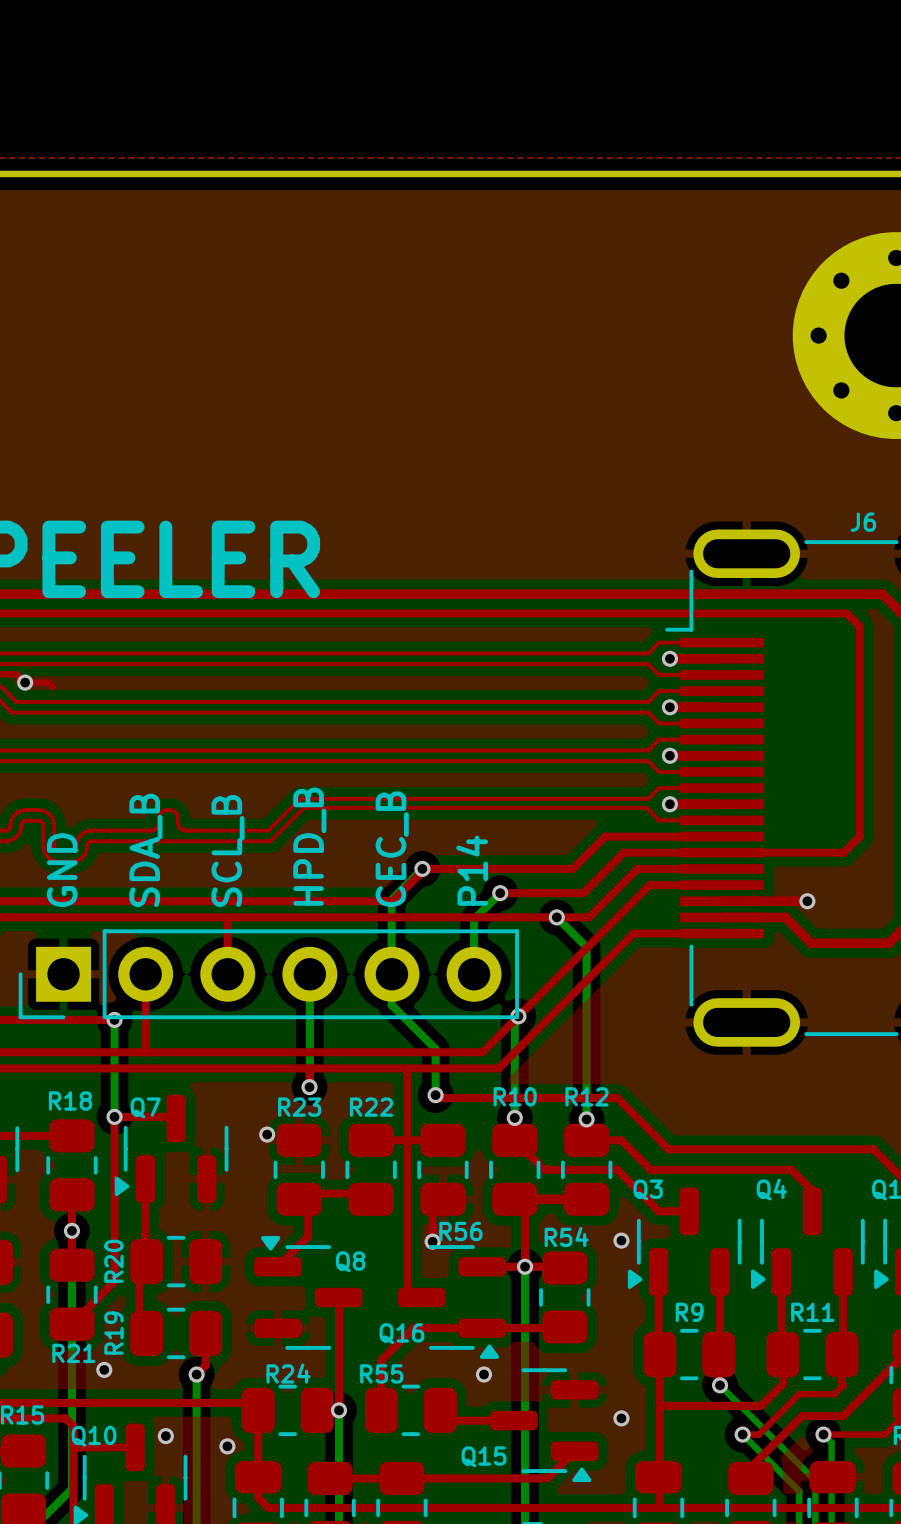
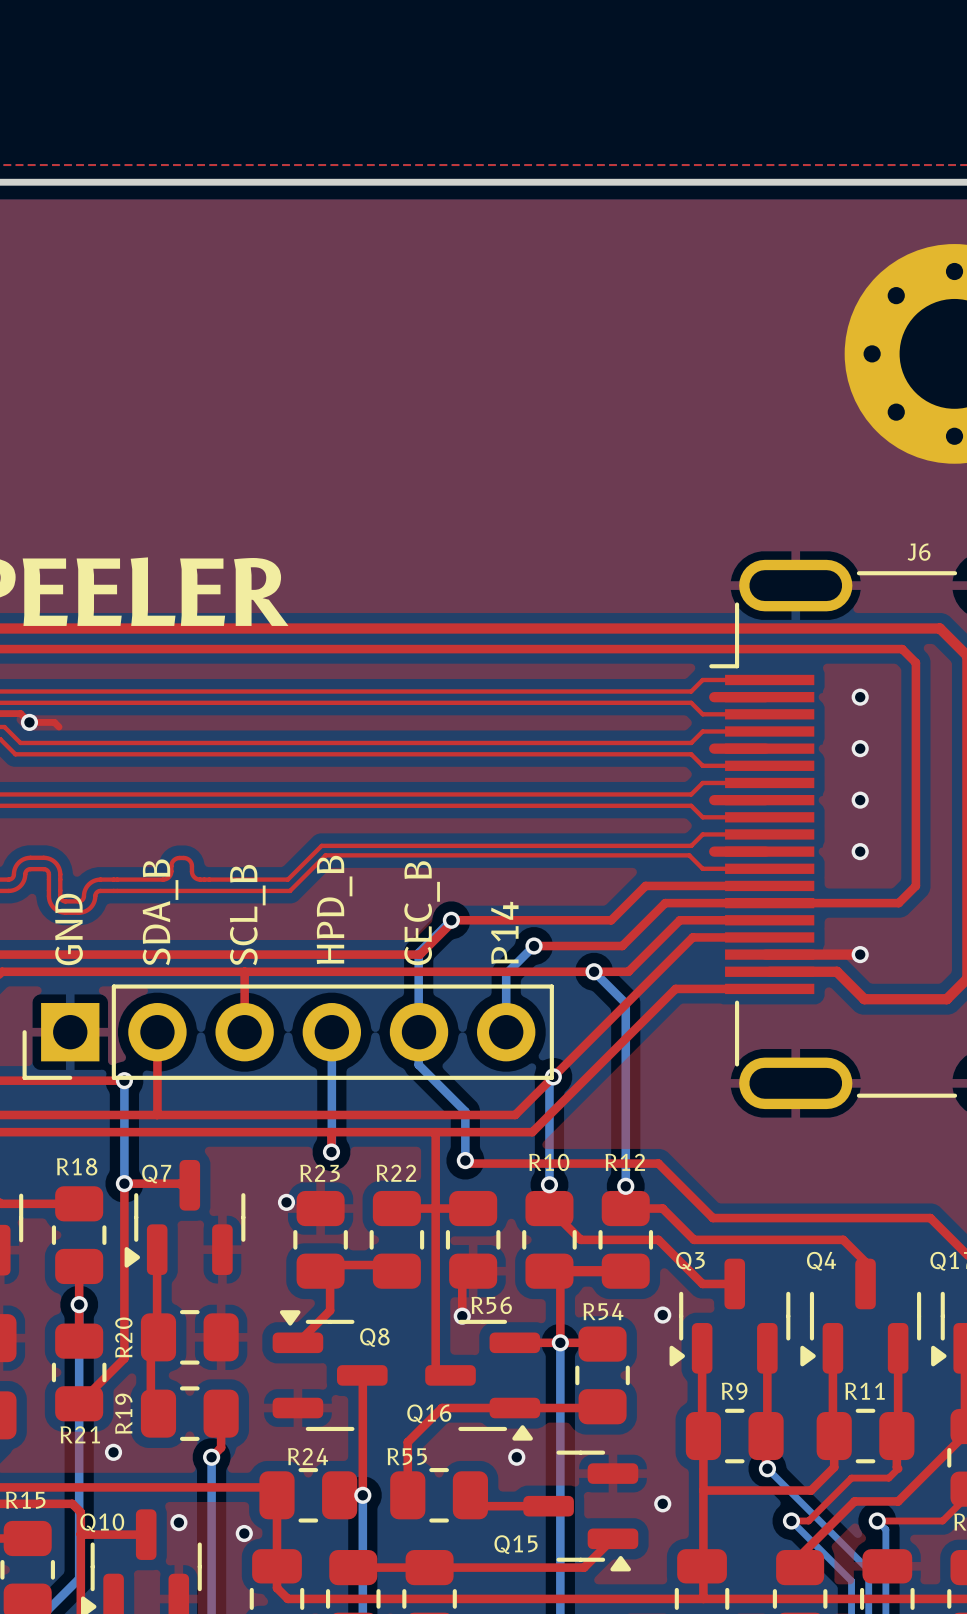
via: (669, 658) -> none
via: none -> (860, 697)
via: (669, 707) -> none
via: none -> (860, 748)
via: (669, 755) -> none
via: none -> (860, 800)
via: (669, 804) -> none
via: none -> (860, 851)

